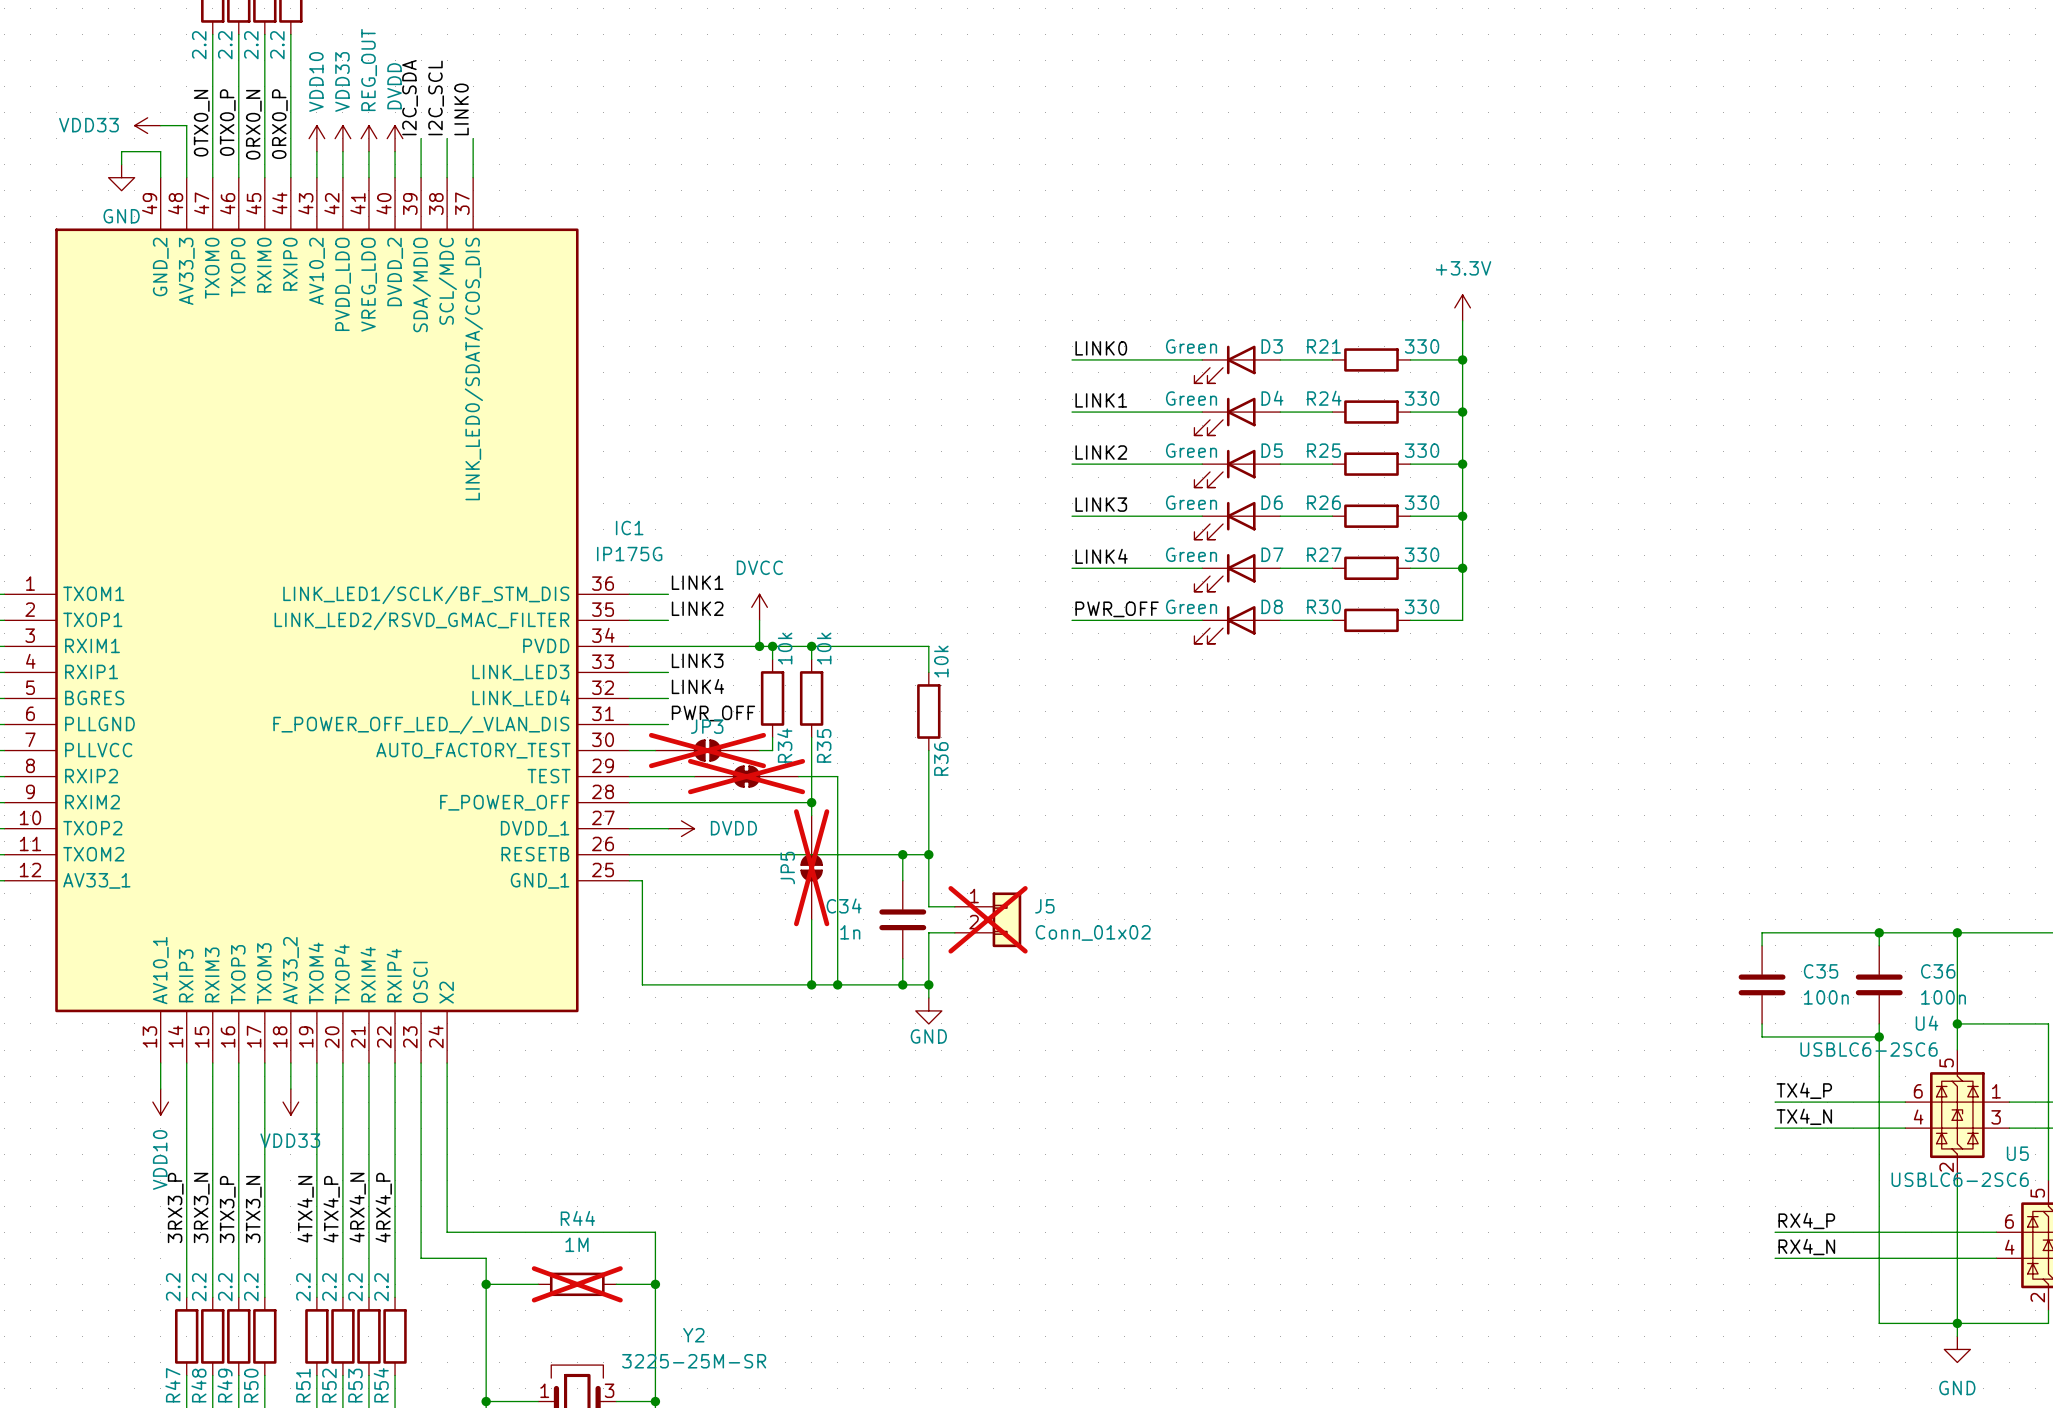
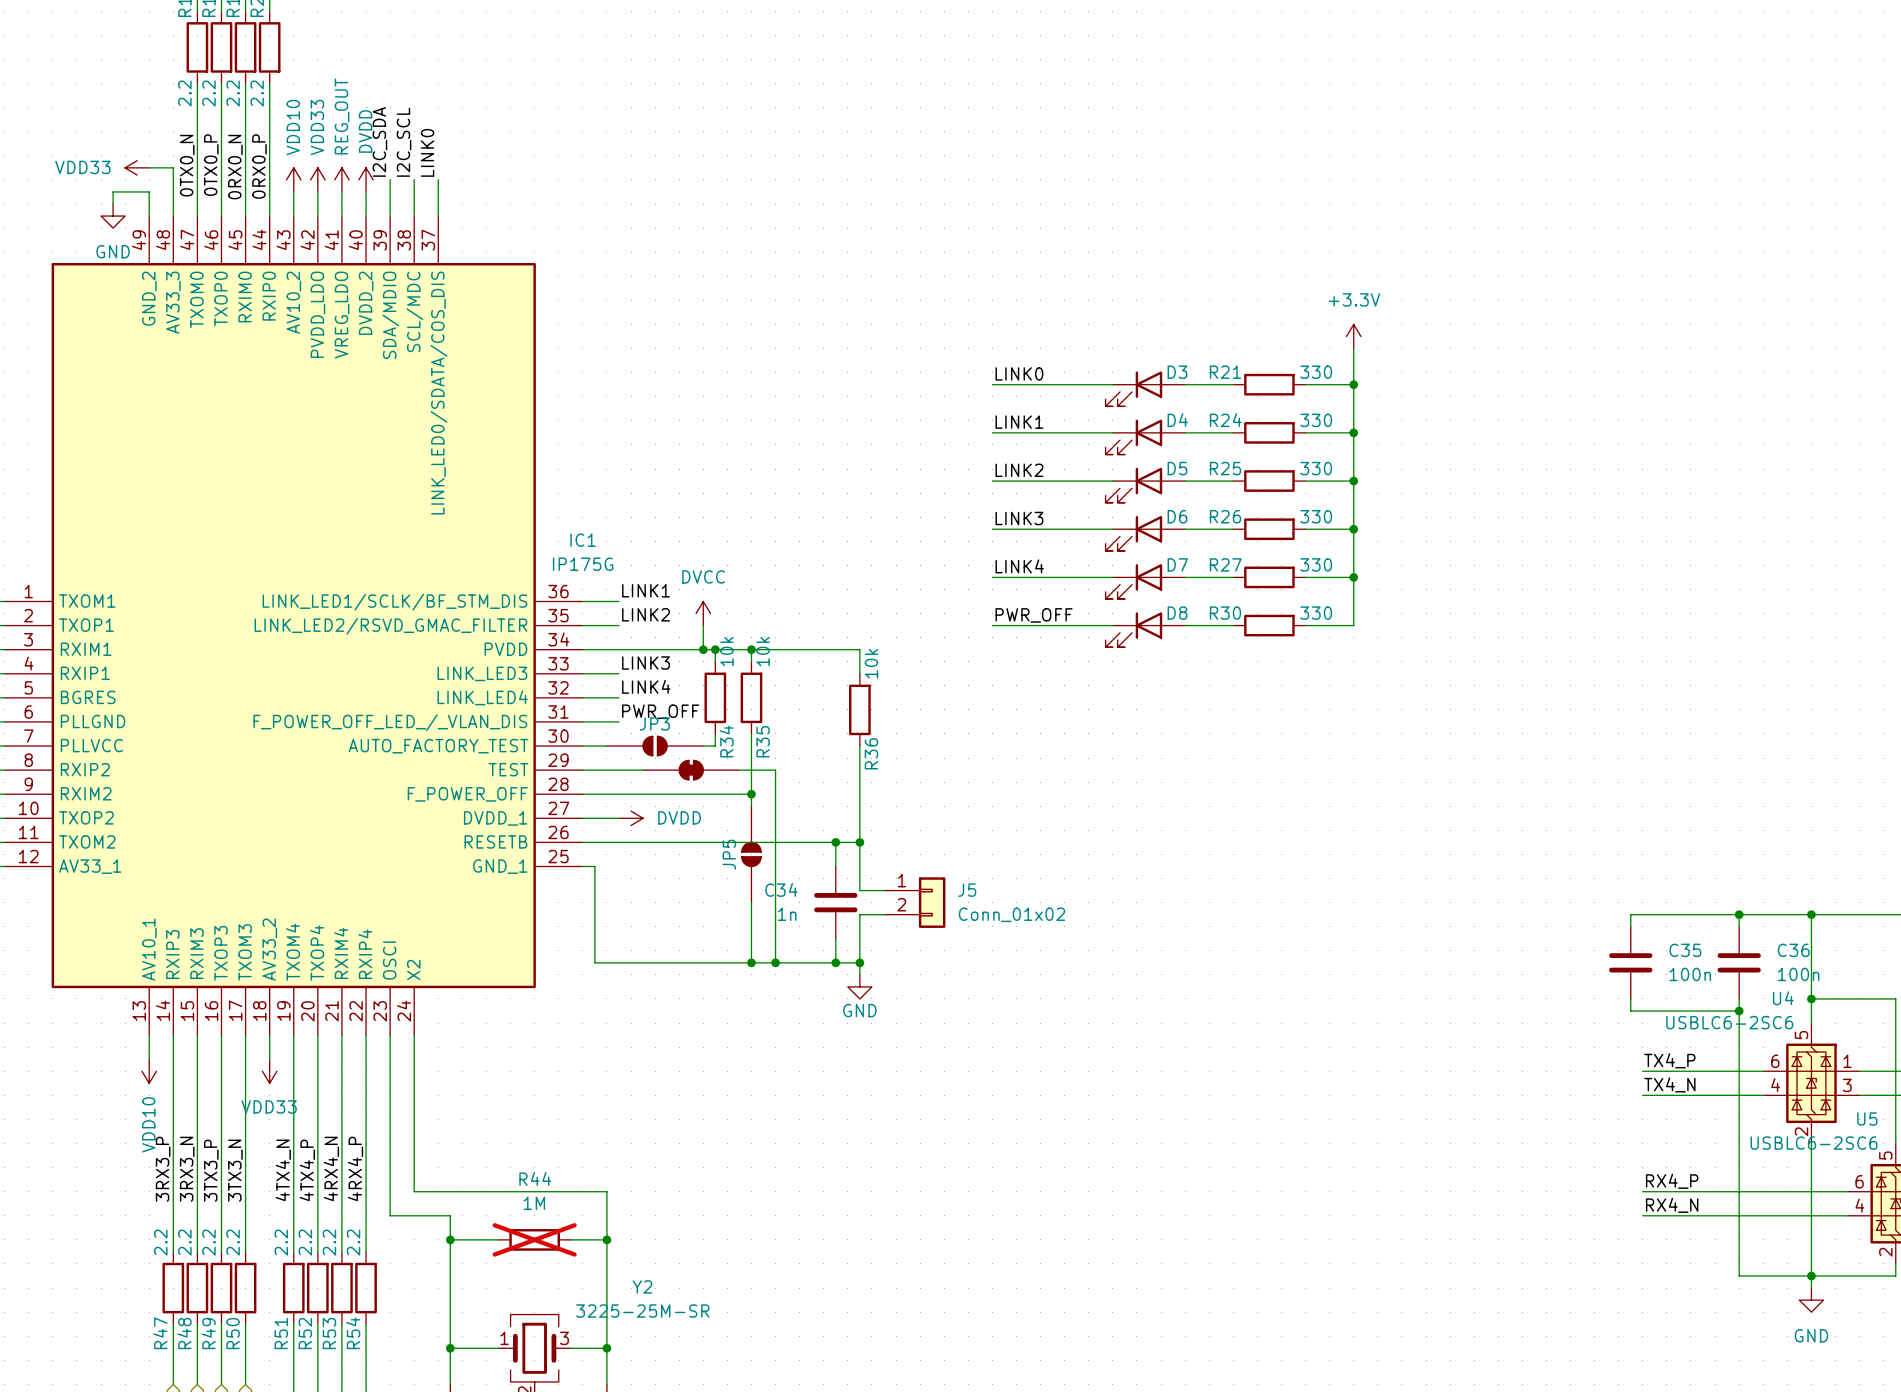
D3 value: Green (1191, 346) -> none
D4 value: Green (1191, 398) -> none
D5 value: Green (1191, 450) -> none
D6 value: Green (1191, 502) -> none
D7 value: Green (1191, 554) -> none
D8 value: Green (1191, 606) -> none
JP3 do-not-place cross: (707, 750) -> none
part do-not-place cross: (746, 776) -> none
JP5 do-not-place cross: (811, 867) -> none
J5 do-not-place cross: (988, 919) -> none

